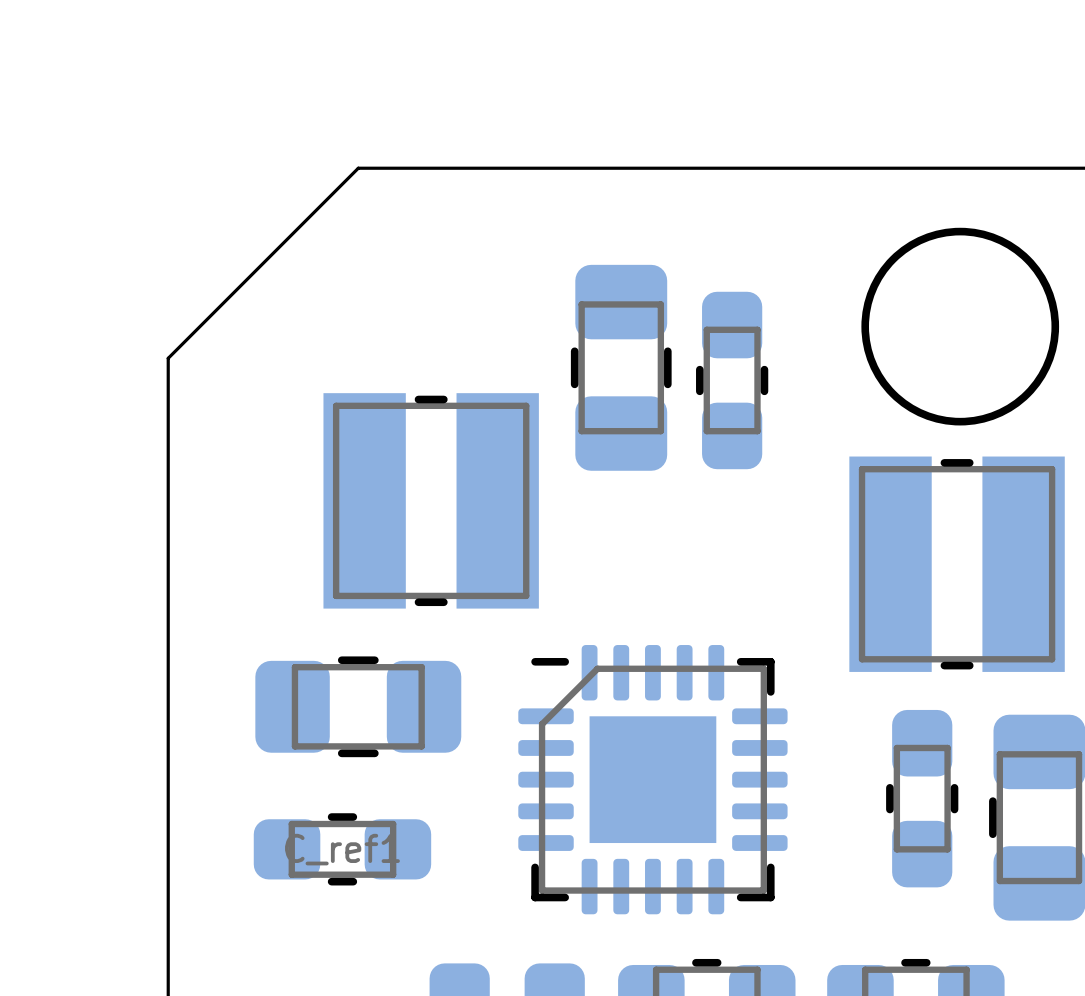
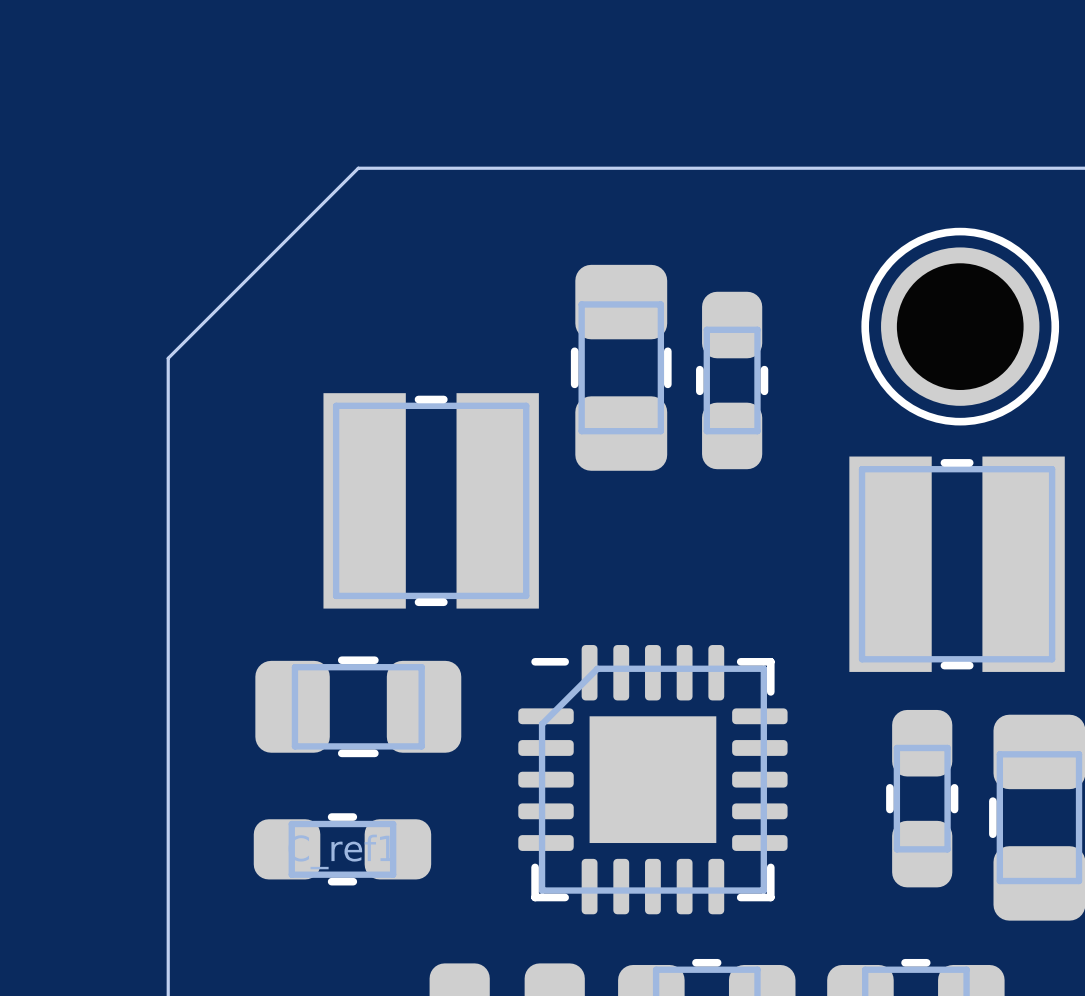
part: none -> (960, 326)

